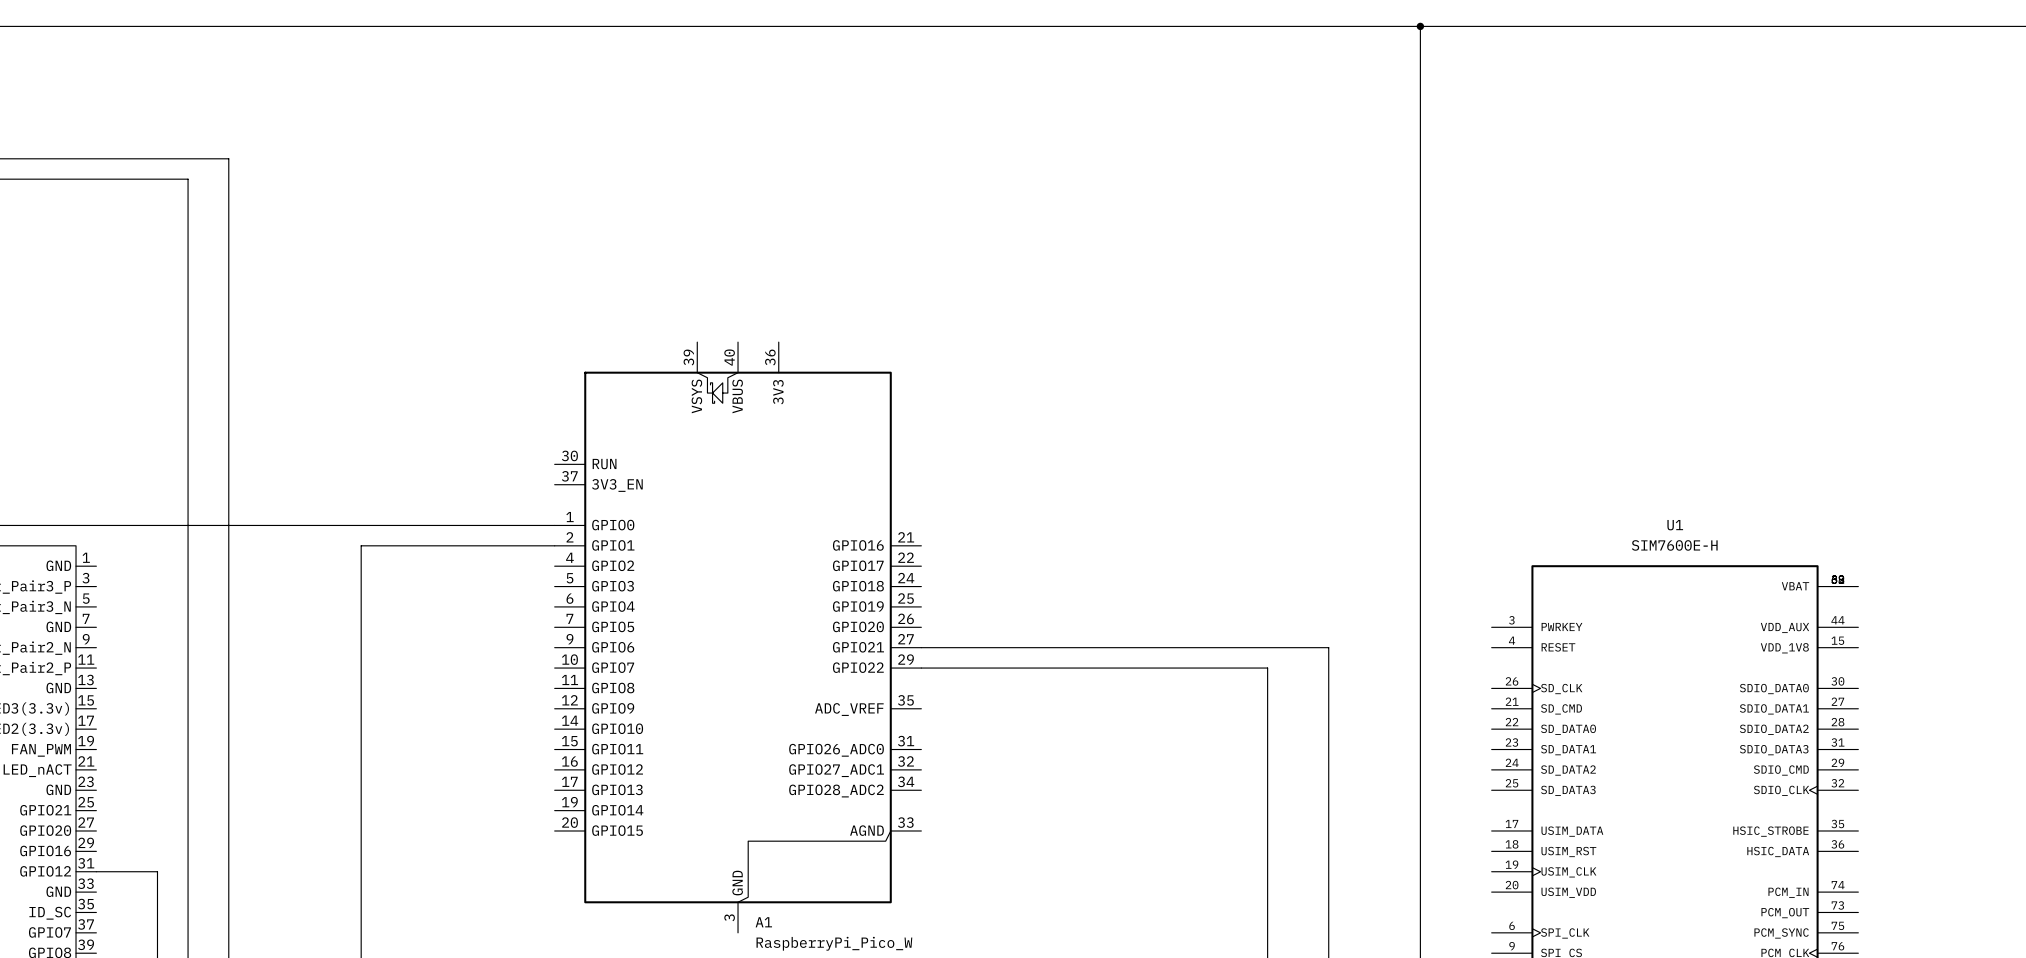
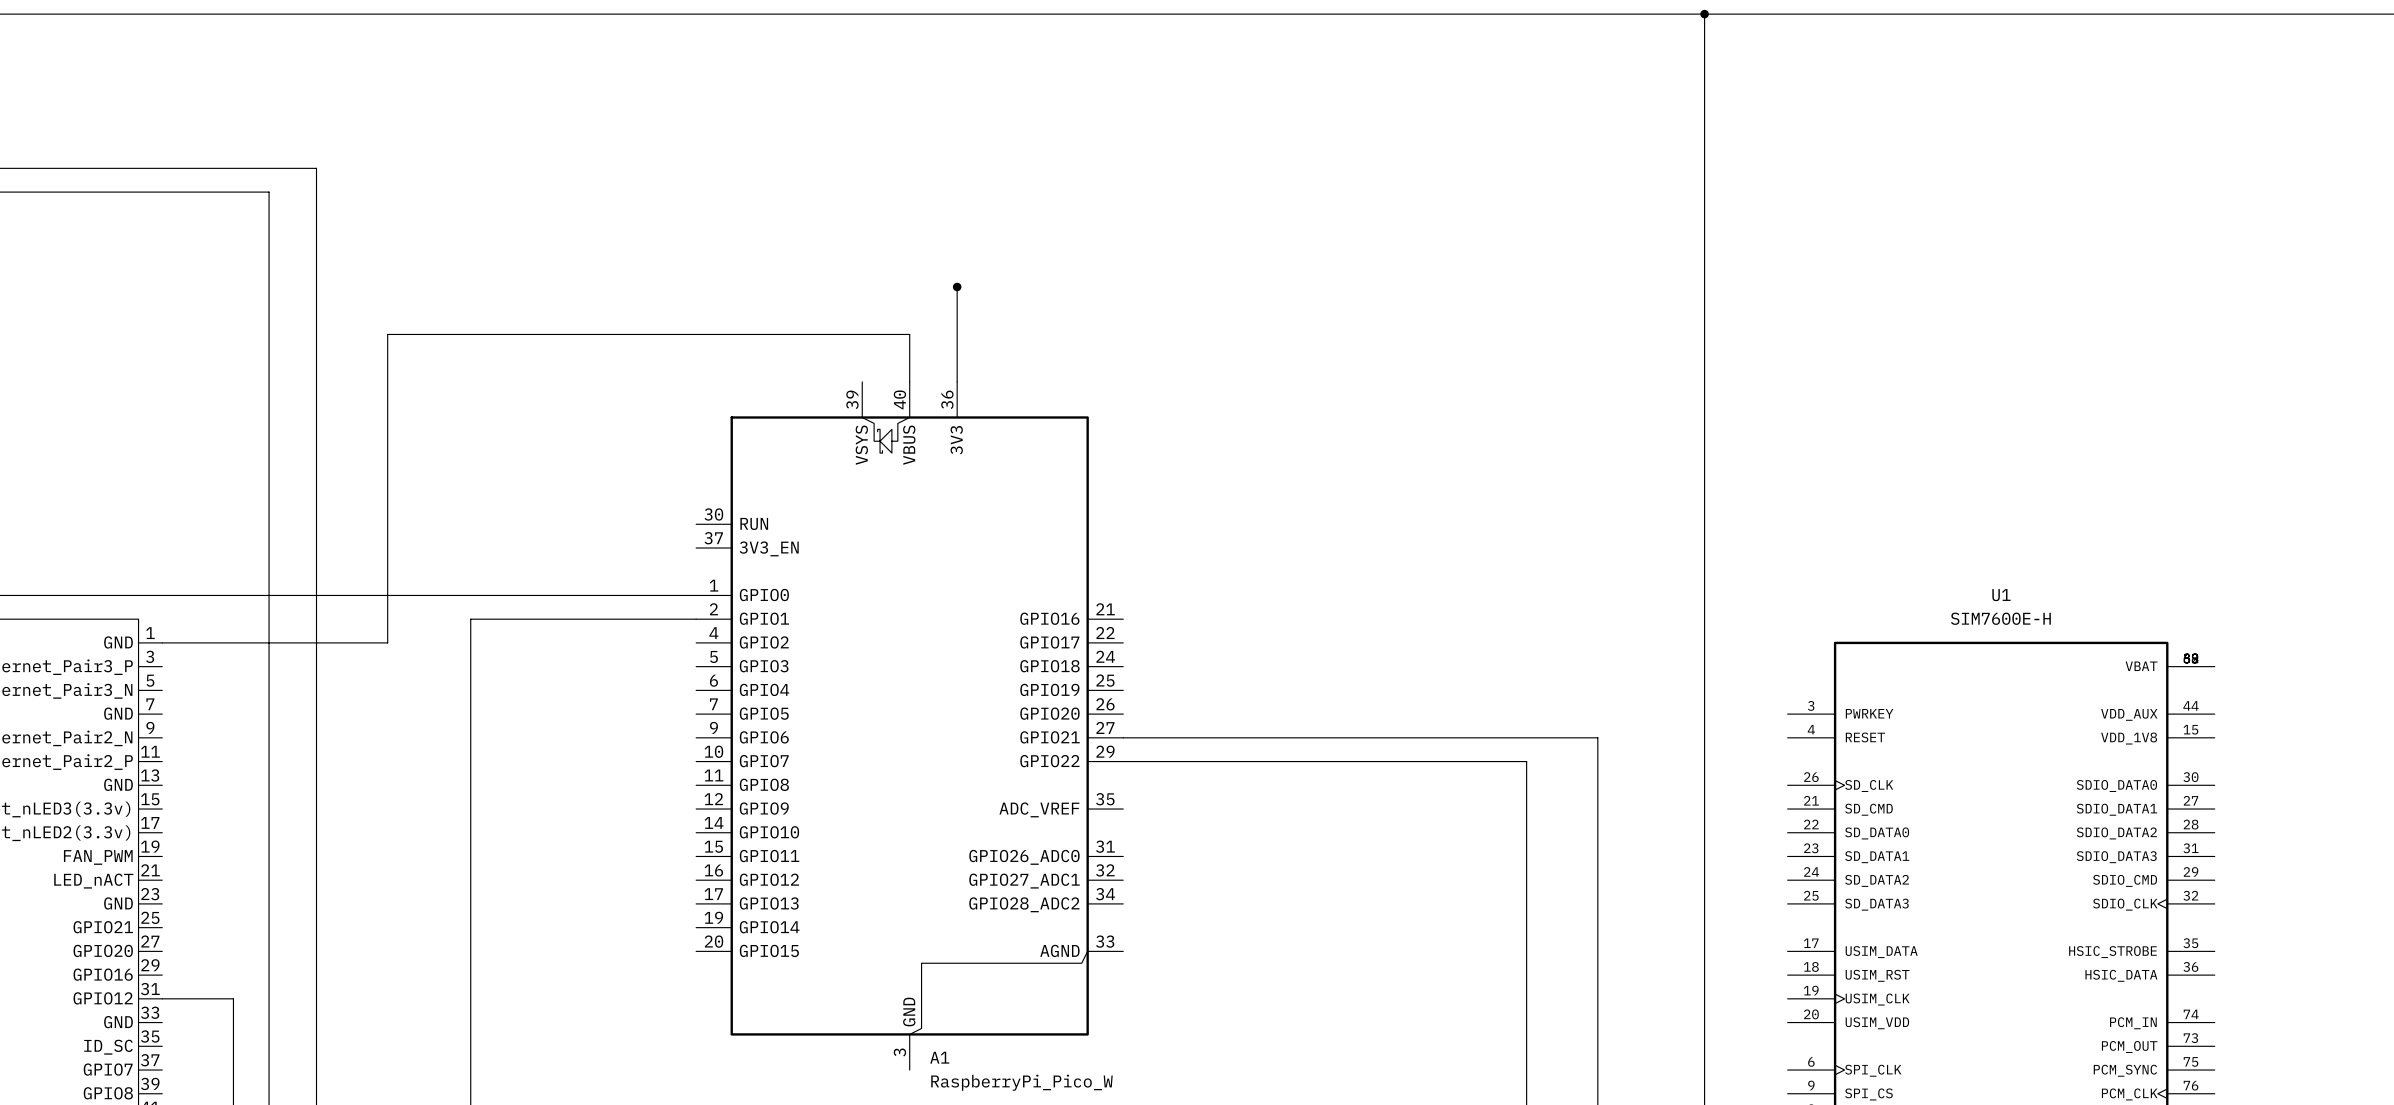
wire: none -> (957, 286) (957, 381)
junction: none -> (957, 286)
wire: none -> (909, 381) (909, 334) (387, 334) (387, 642) (162, 642)

